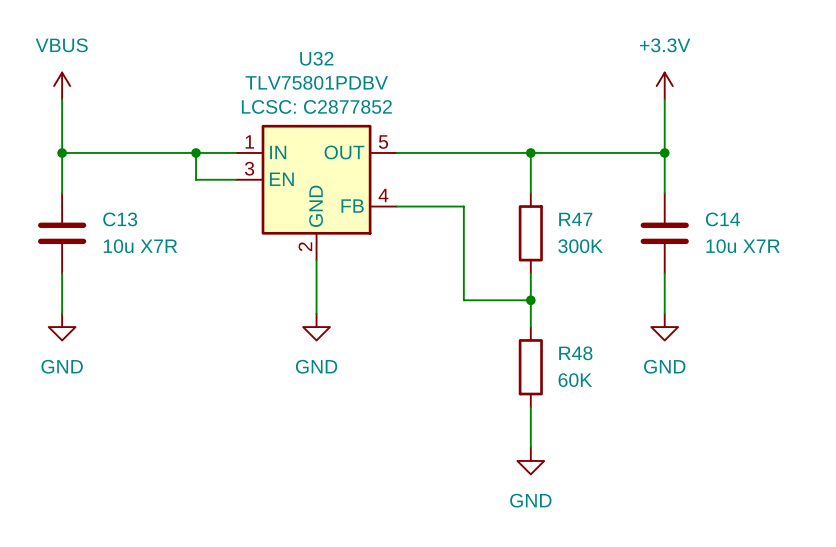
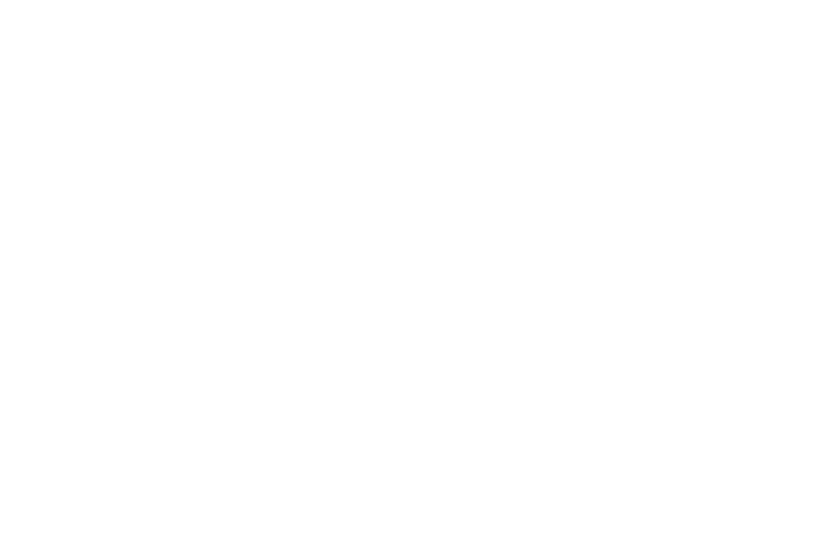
power symbol: VBUS (62, 86) -> none
power symbol: +3.3V (664, 86) -> none
wire: (62, 99) (62, 193) -> none
wire: (664, 99) (664, 193) -> none
wire: (62, 152) (236, 152) -> none
junction: (62, 152) -> none
wire: (196, 152) (196, 179) (236, 179) -> none
junction: (196, 152) -> none
wire: (396, 152) (664, 152) -> none
wire: (530, 152) (530, 193) -> none
junction: (530, 152) -> none
junction: (664, 152) -> none
U32: TLV75801PDBV (316, 192) -> none
wire: (396, 206) (463, 206) (463, 300) (530, 300) -> none
C13: 10u X7R (62, 233) -> none
R47: 300K (530, 233) -> none
C14: 10u X7R (664, 233) -> none
wire: (316, 260) (316, 313) -> none
wire: (62, 273) (62, 313) -> none
wire: (530, 273) (530, 327) -> none
wire: (664, 273) (664, 313) -> none
junction: (530, 300) -> none
power symbol: GND (62, 327) -> none
power symbol: GND (316, 327) -> none
power symbol: GND (664, 327) -> none
R48: 60K (530, 367) -> none
wire: (530, 407) (530, 447) -> none
power symbol: GND (530, 460) -> none

